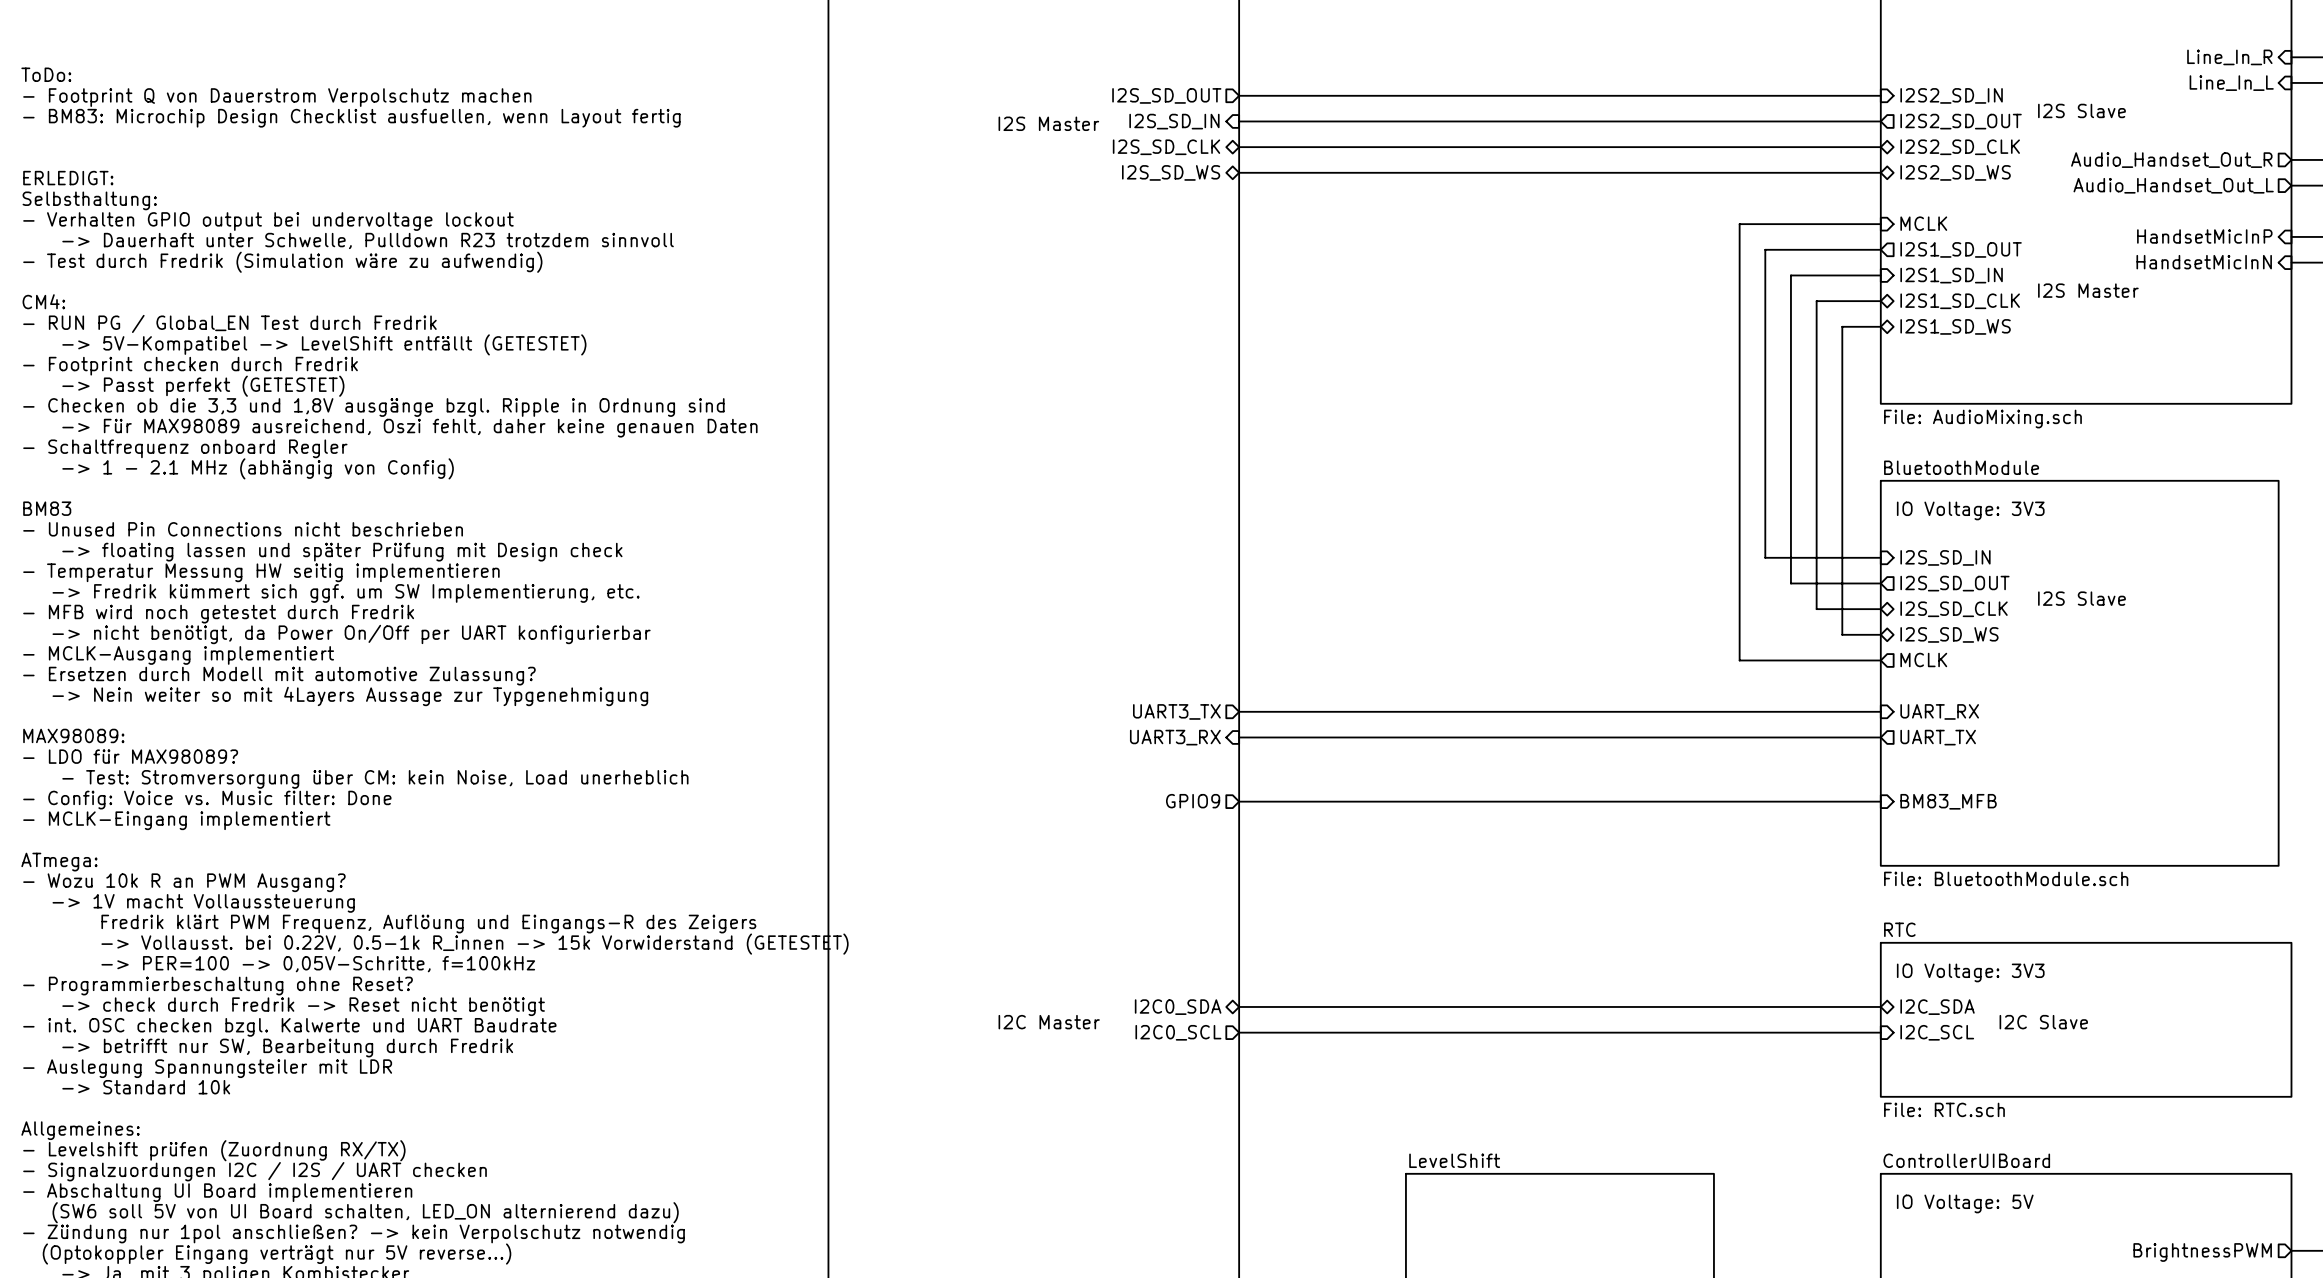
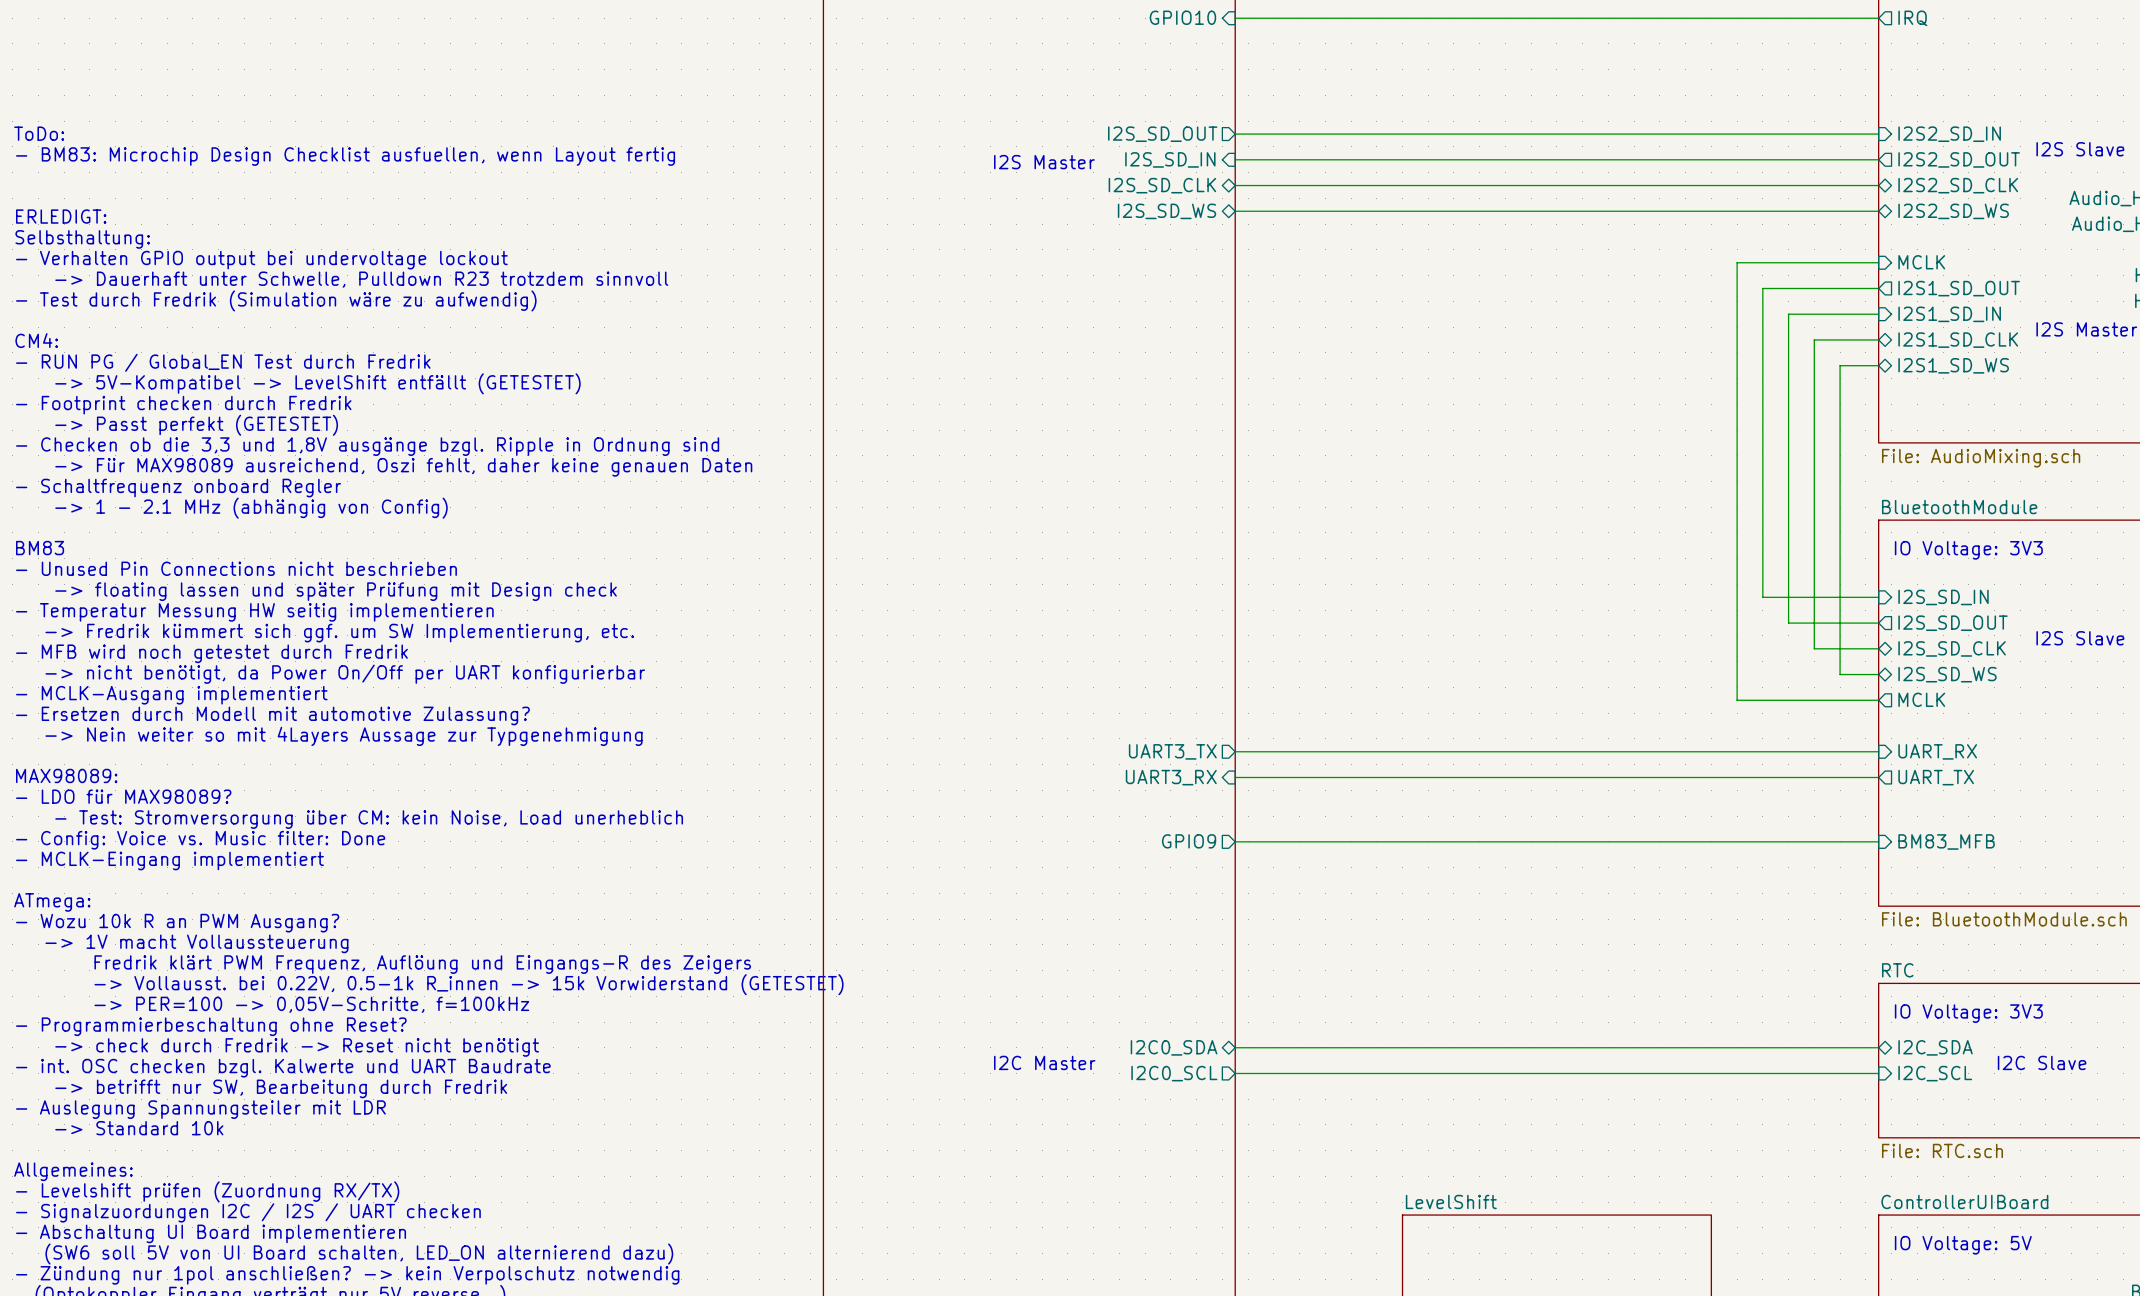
text: ToDo: (46, 74) -> none
text: - Footprint Q von Dauerstrom Verpolschutz machen (277, 97) -> ToDo: (39, 133)

